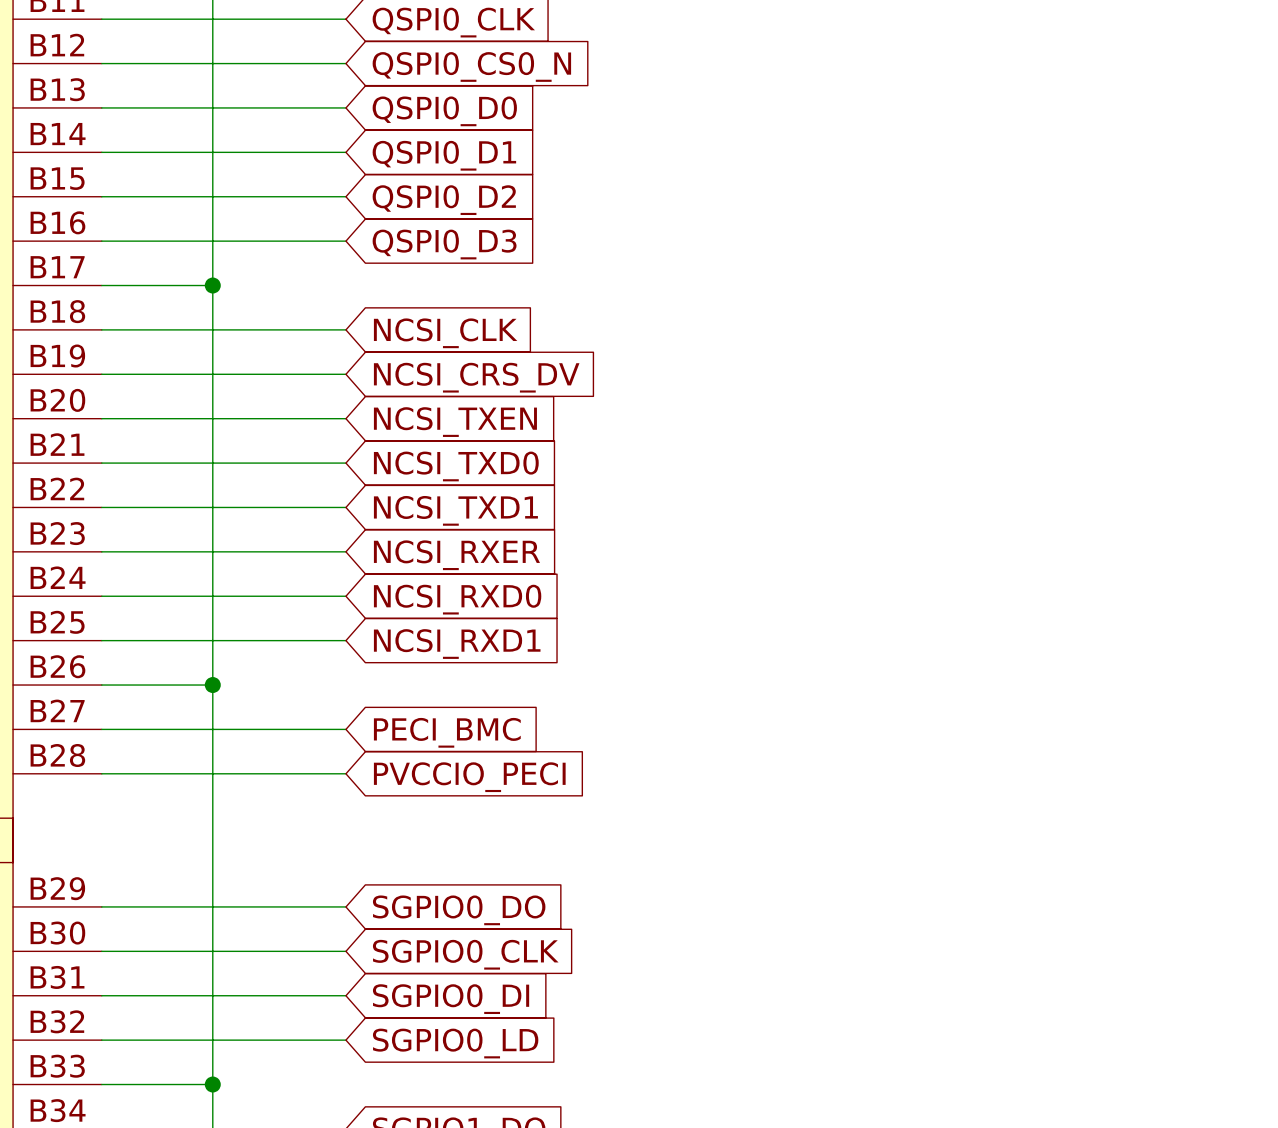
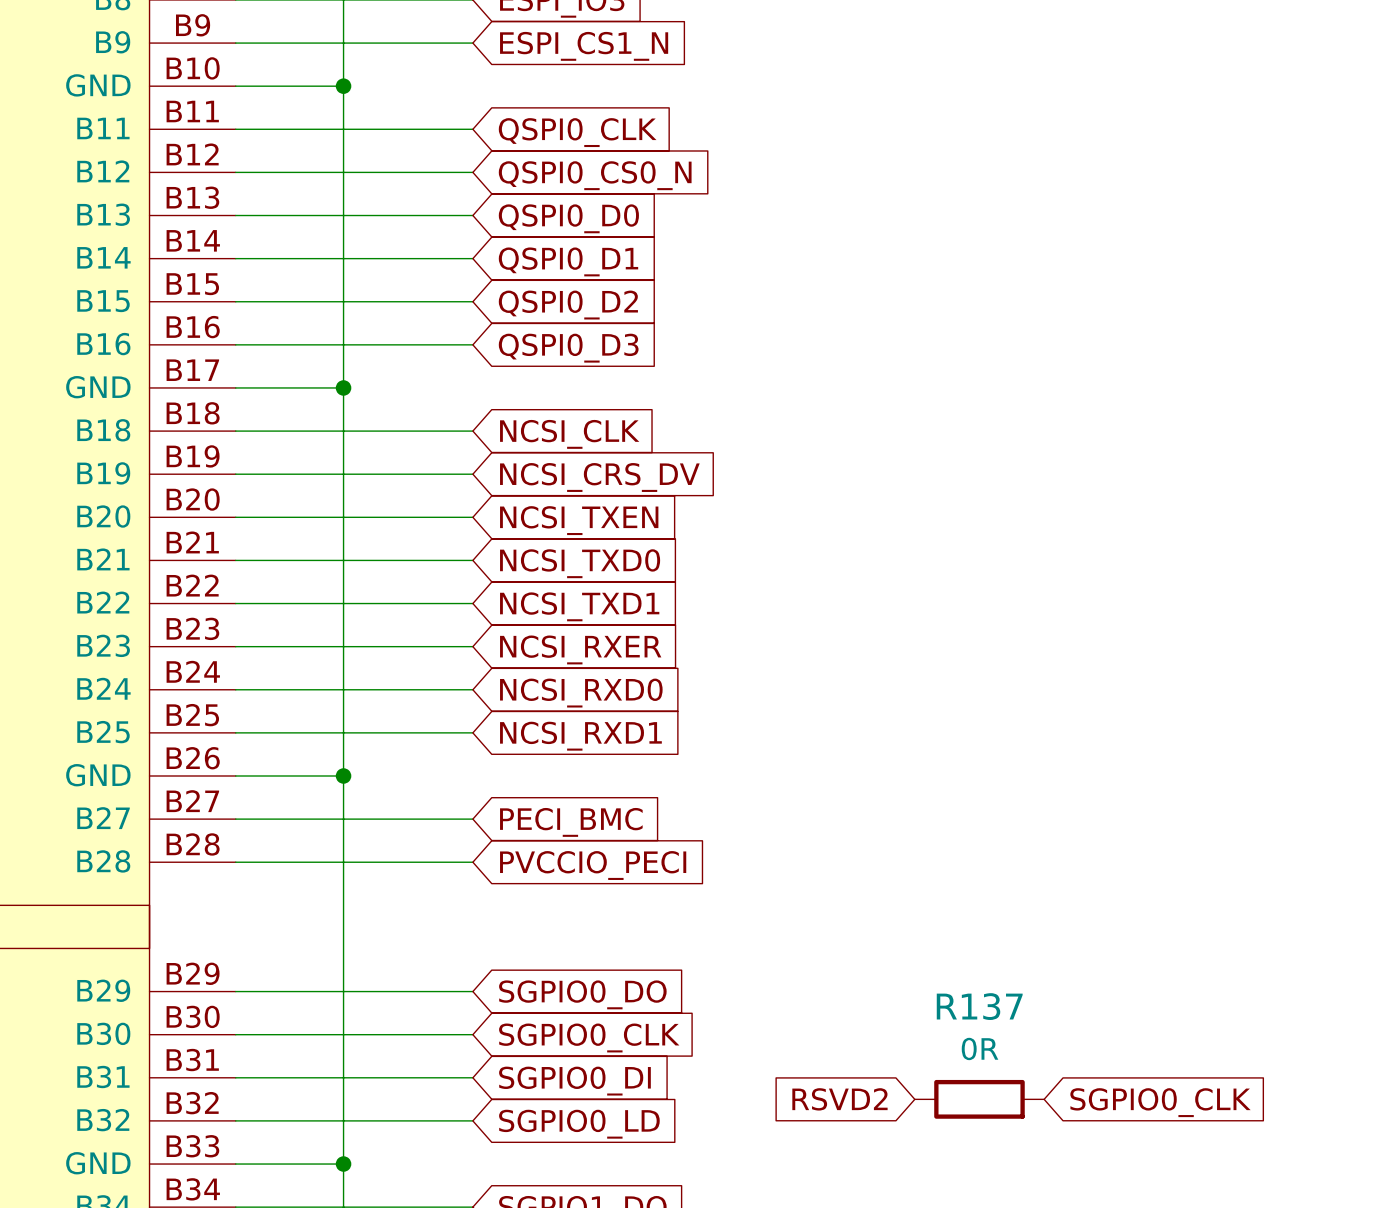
global label: none -> RSVD2 (839, 1099)
R137: none -> (979, 1099)
global label: none -> SGPIO0_CLK (1160, 1102)

